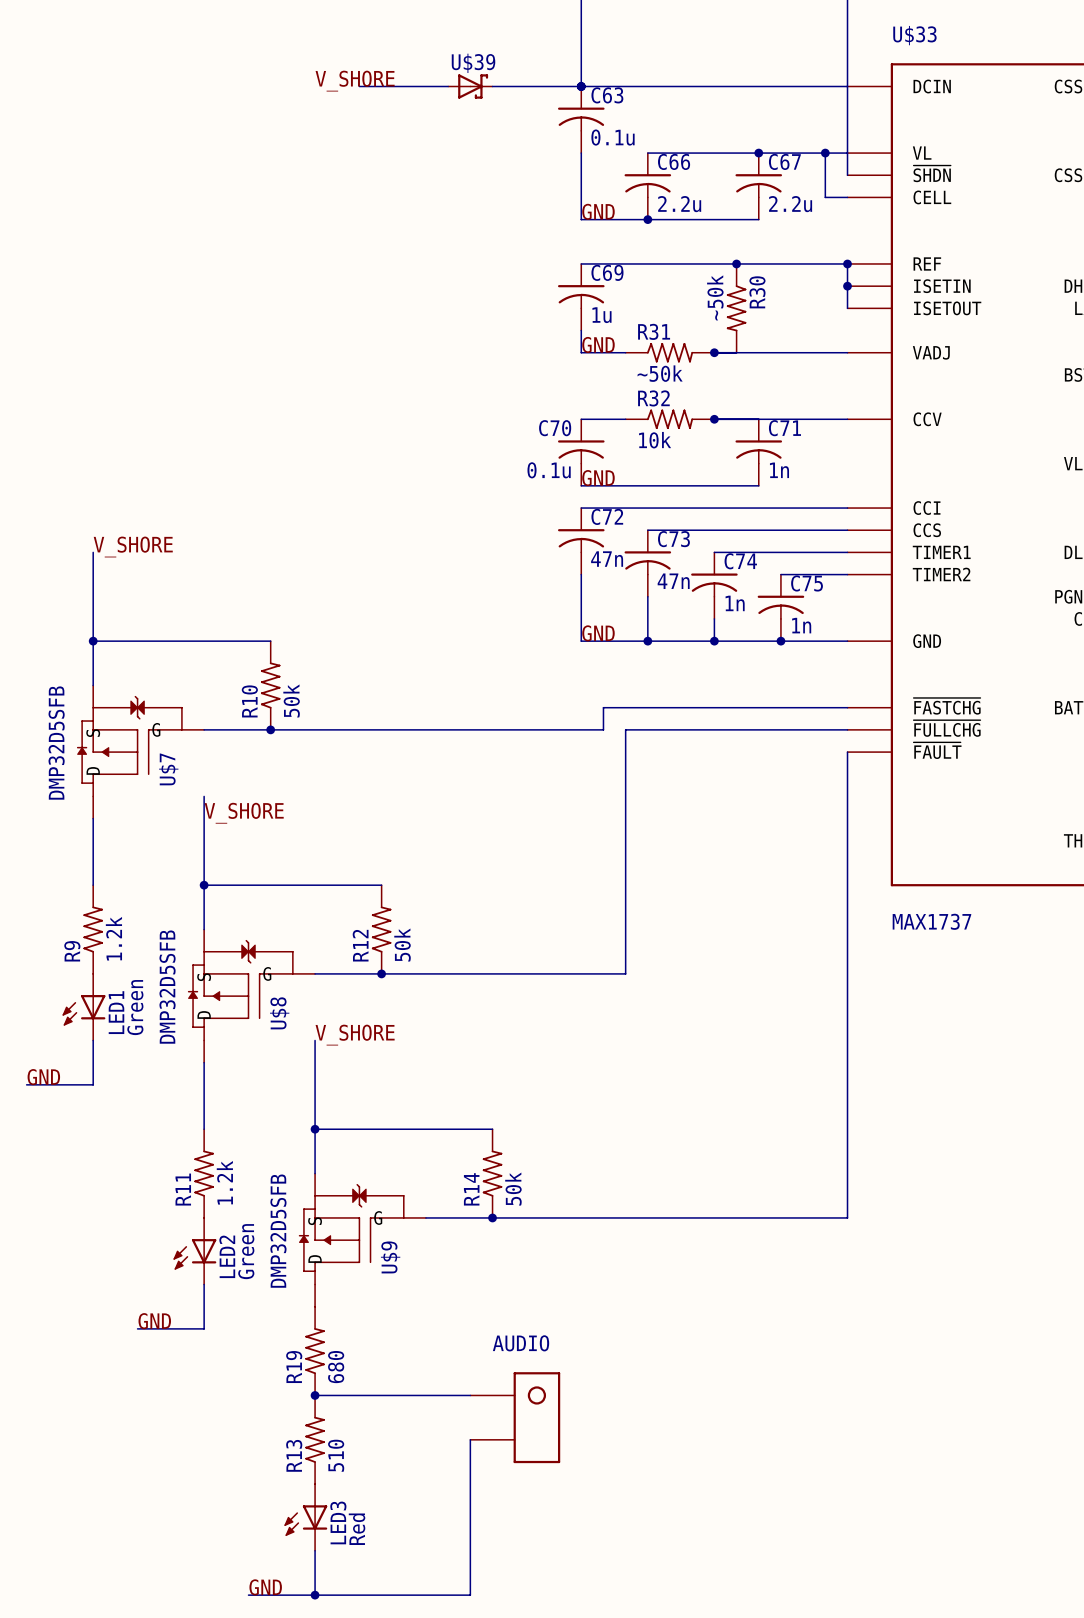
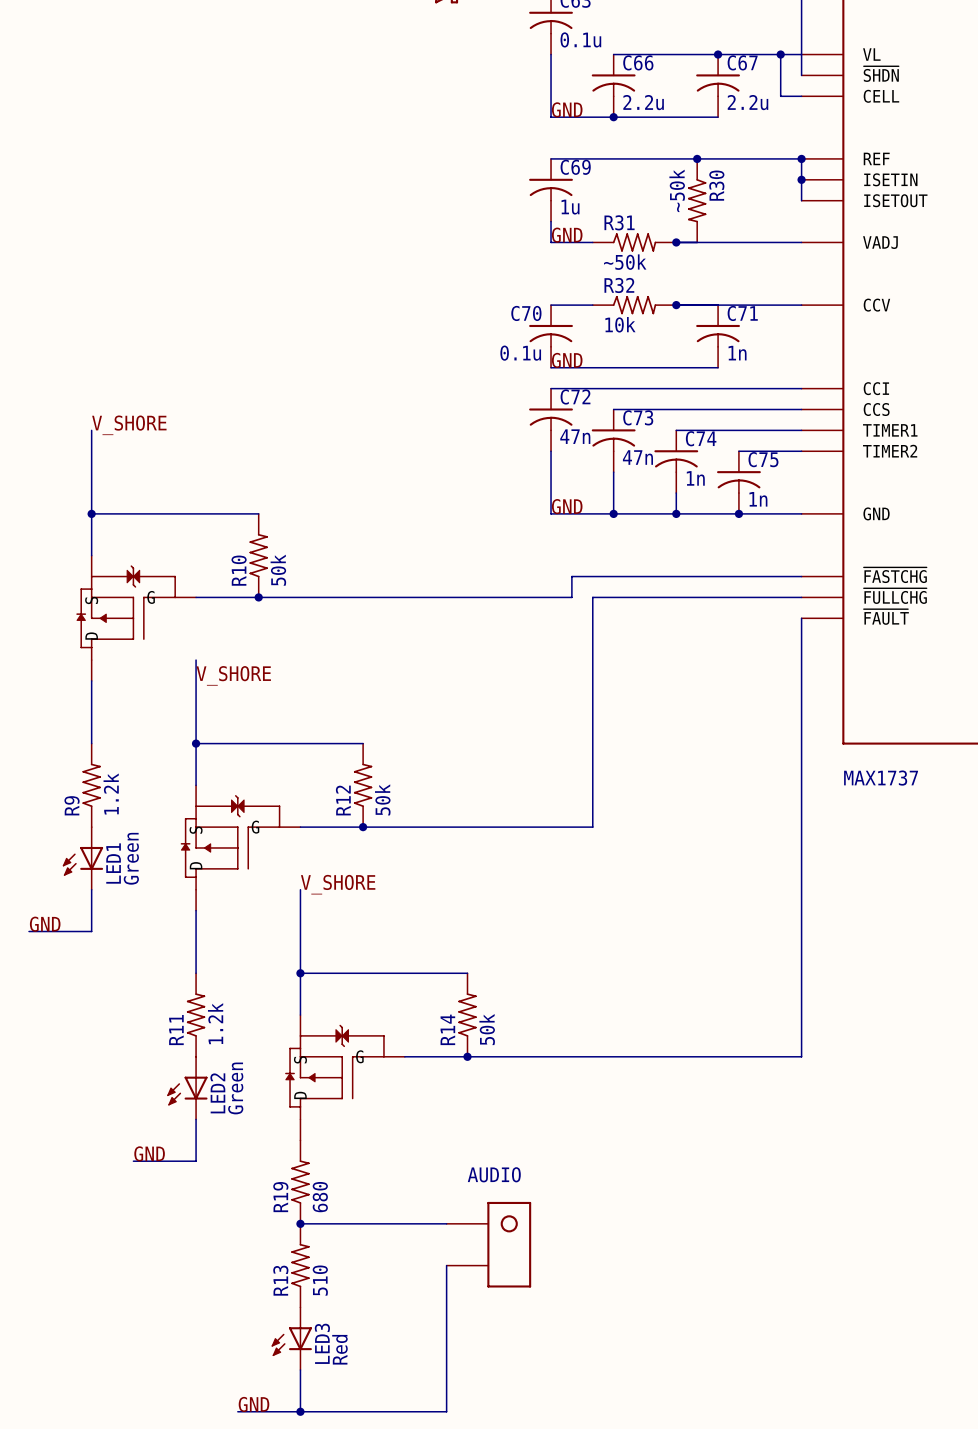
U$7 value: DMP32D5SFB (56, 743) -> none
U$7 name: U$7 (168, 769) -> none
U$8 value: DMP32D5SFB (167, 987) -> none
U$8 name: U$8 (279, 1013) -> none
U$9 value: DMP32D5SFB (278, 1231) -> none
U$9 name: U$9 (390, 1257) -> none

